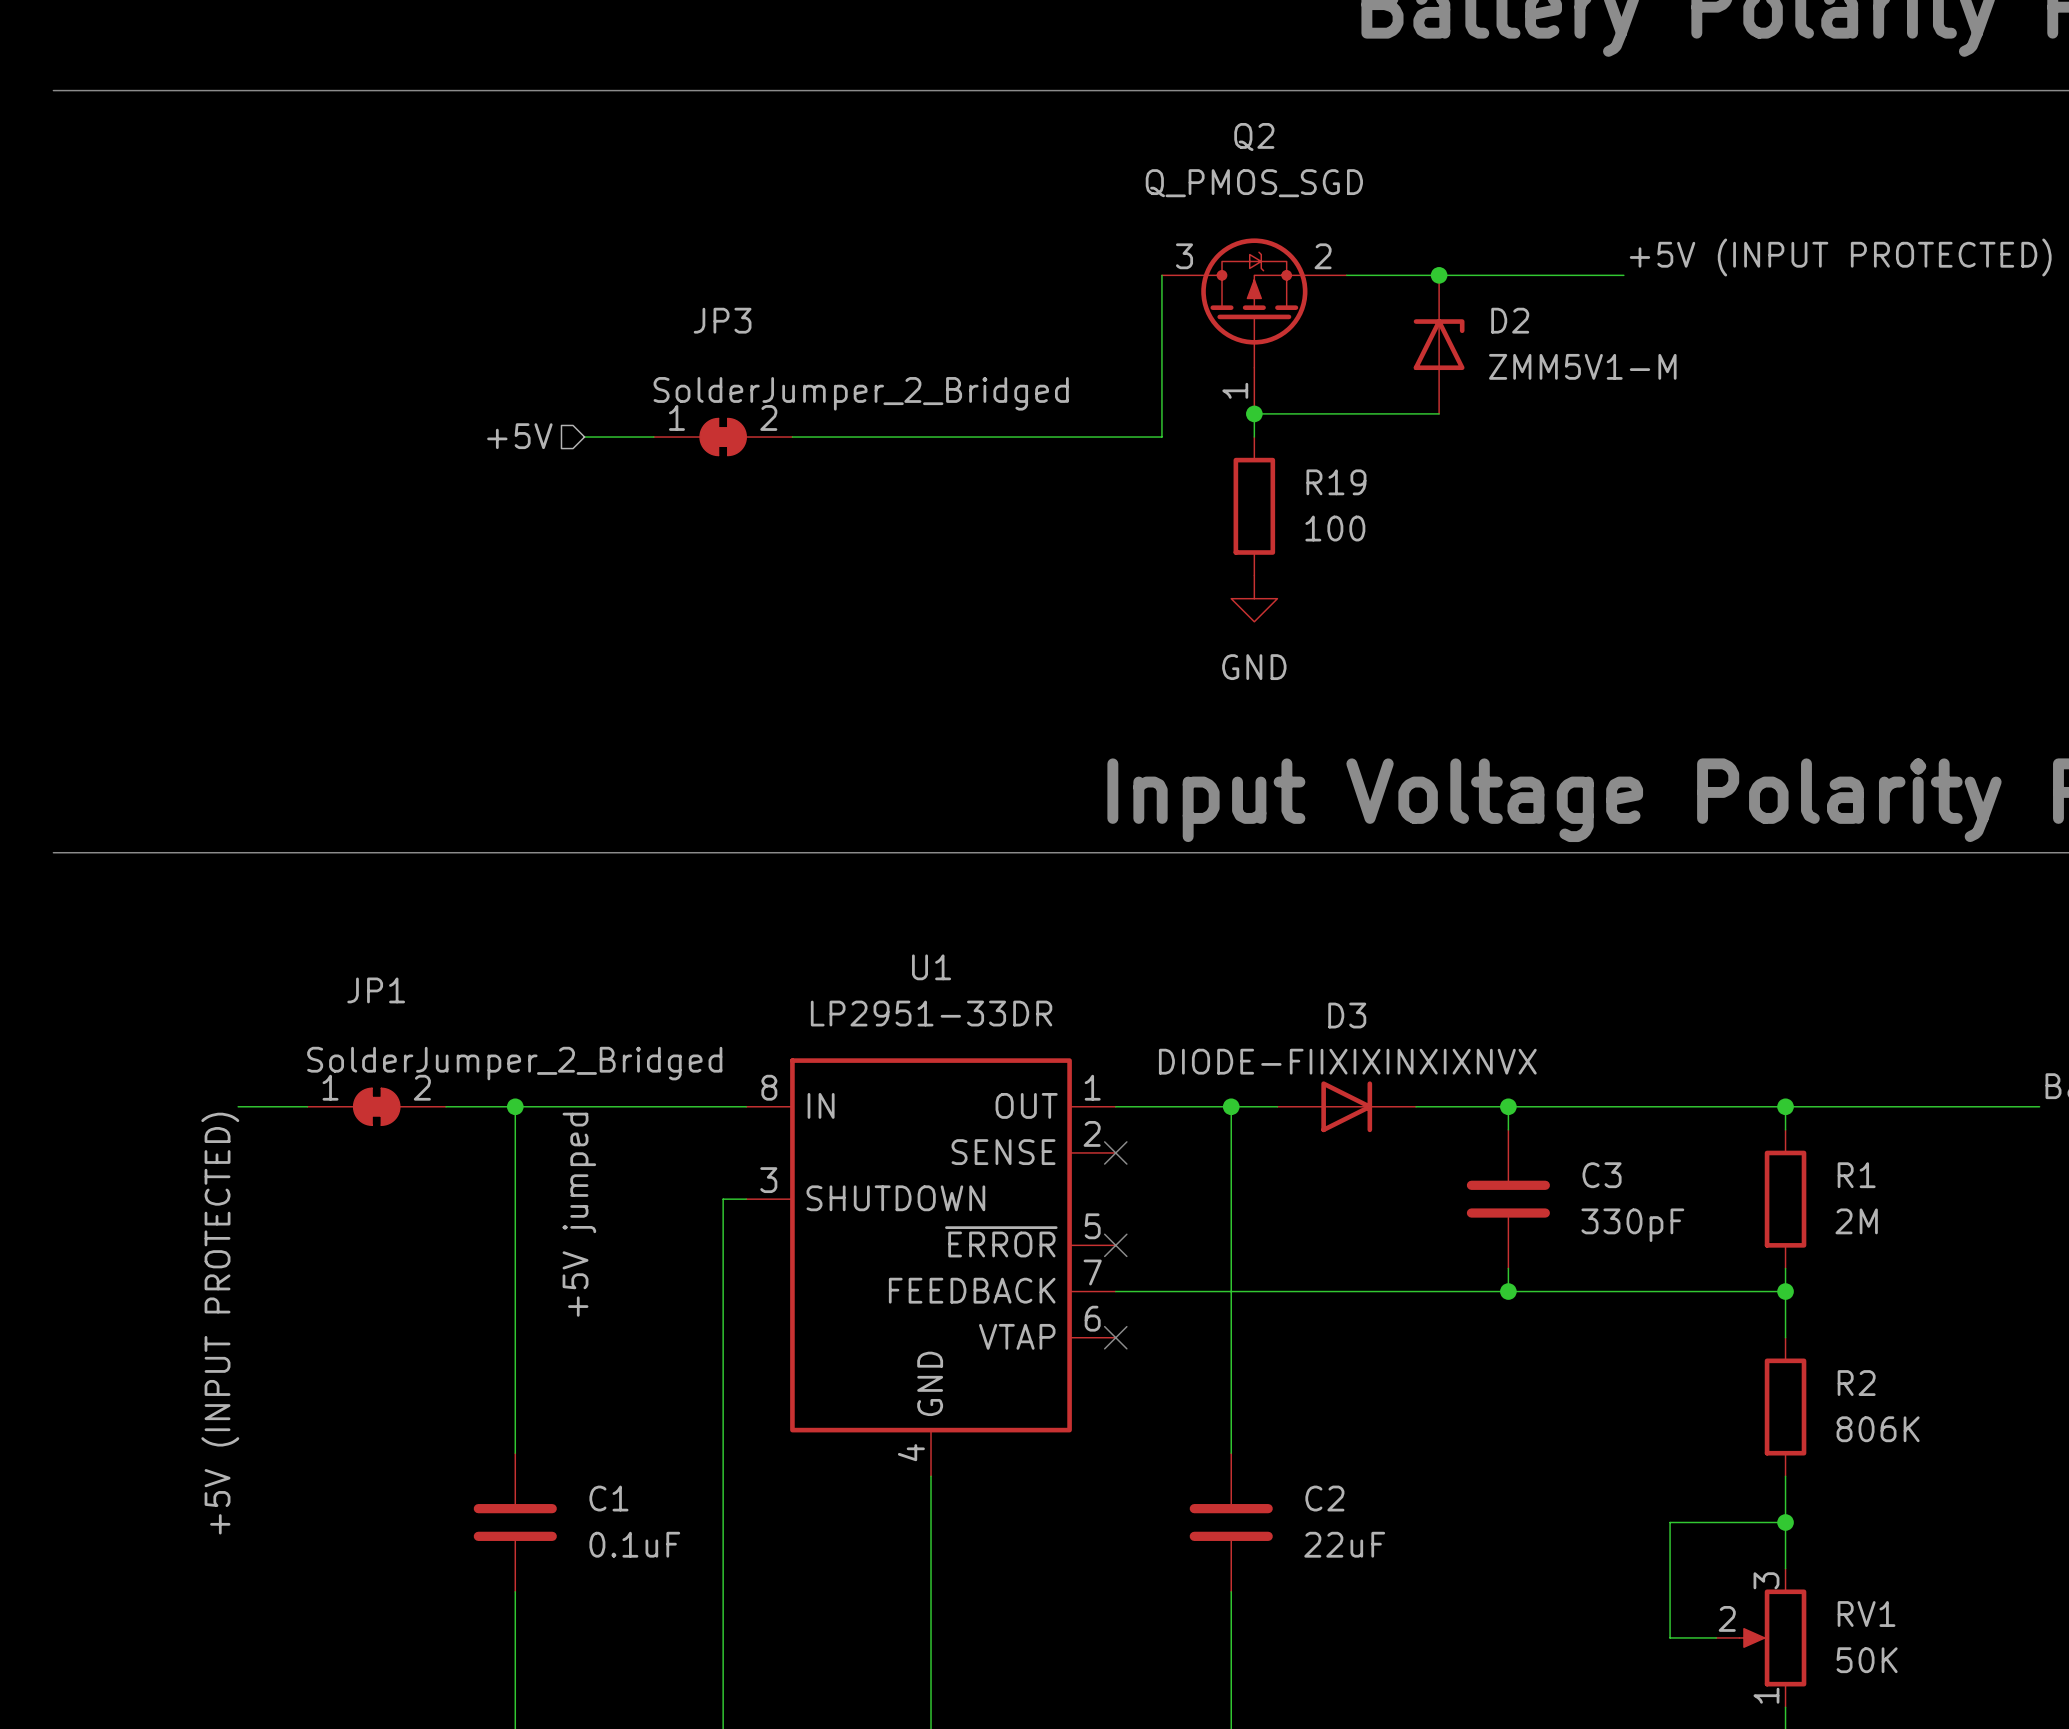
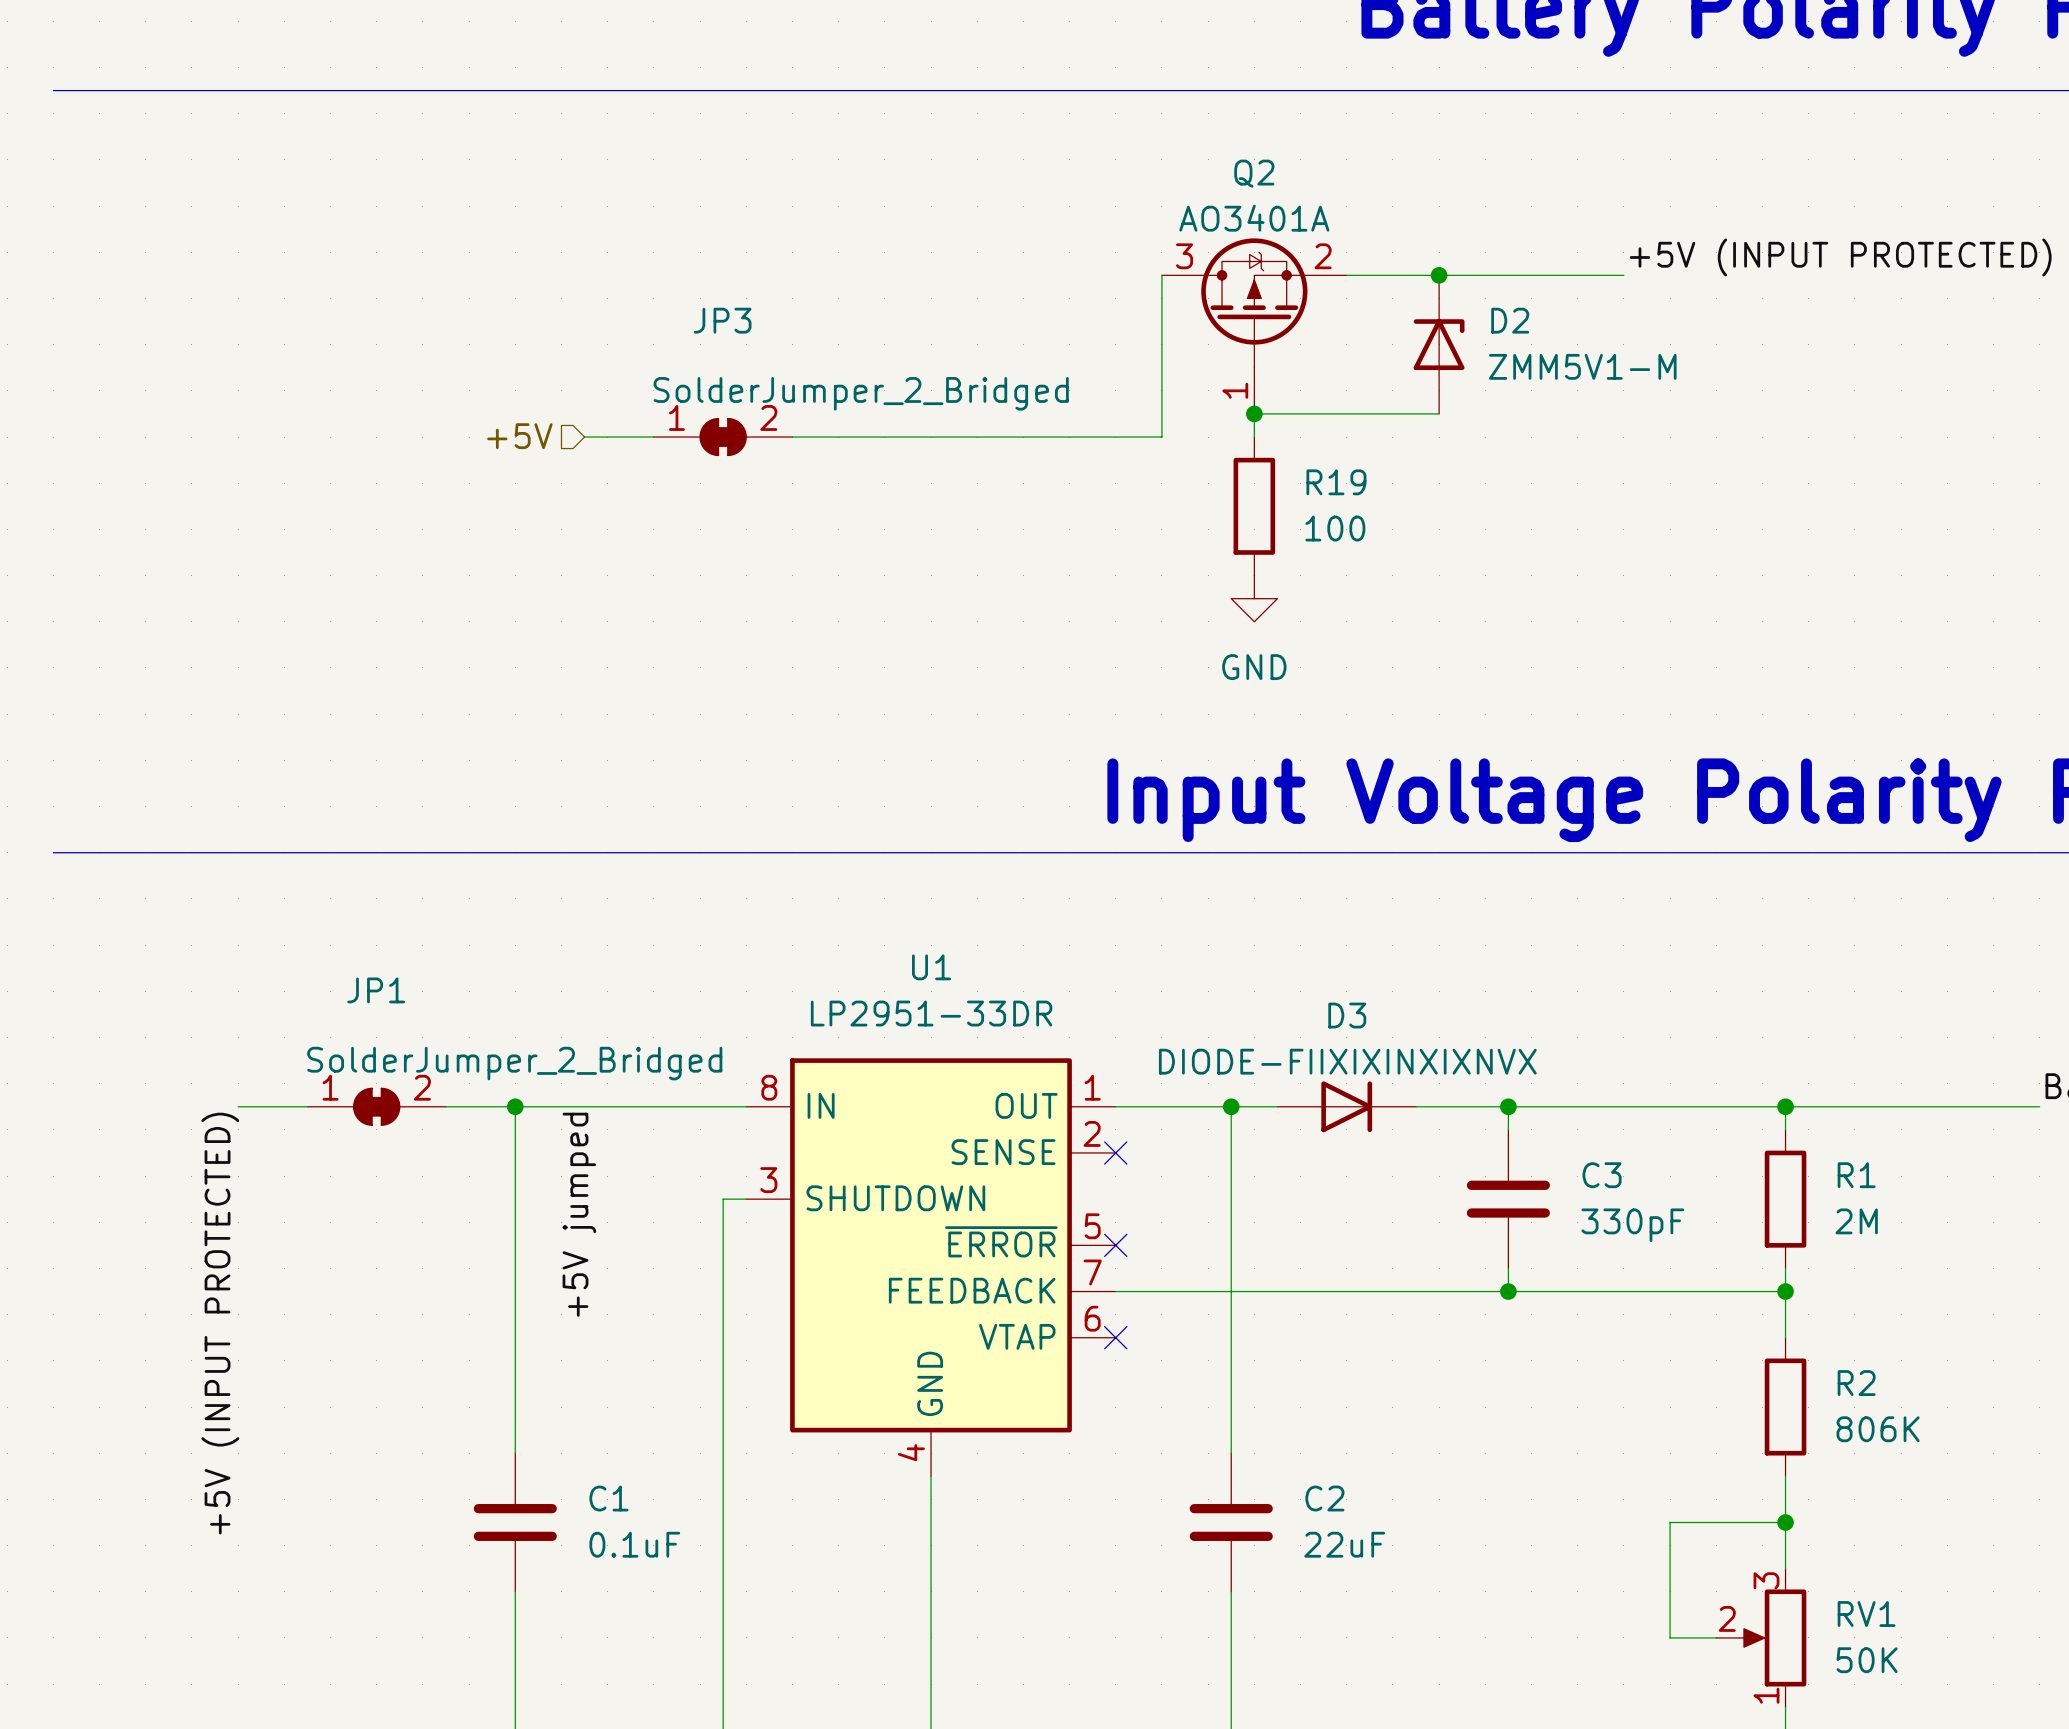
Q2 name position: Q2 (1254, 137) -> Q2 (1254, 173)
Q2 value: Q_PMOS_SGD (1254, 183) -> AO3401A (1254, 218)

